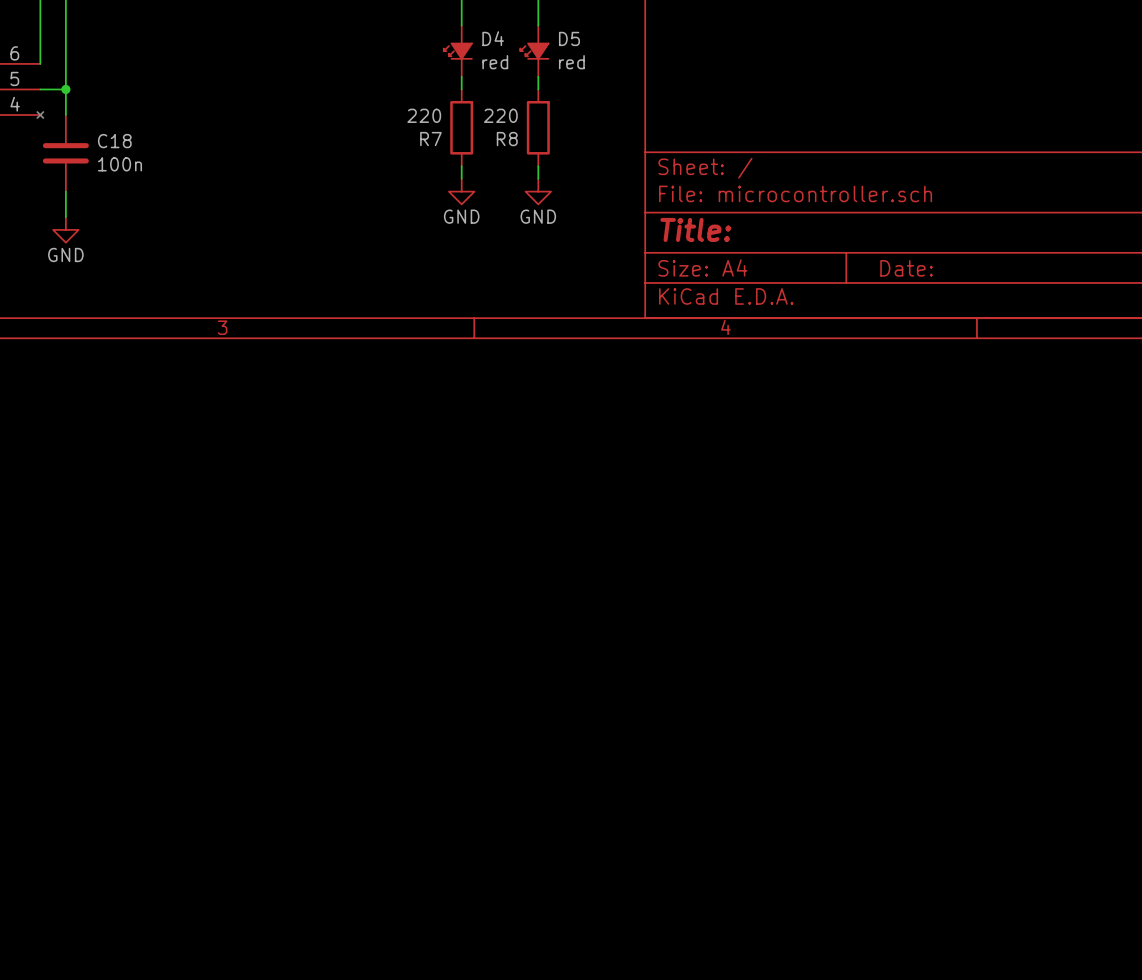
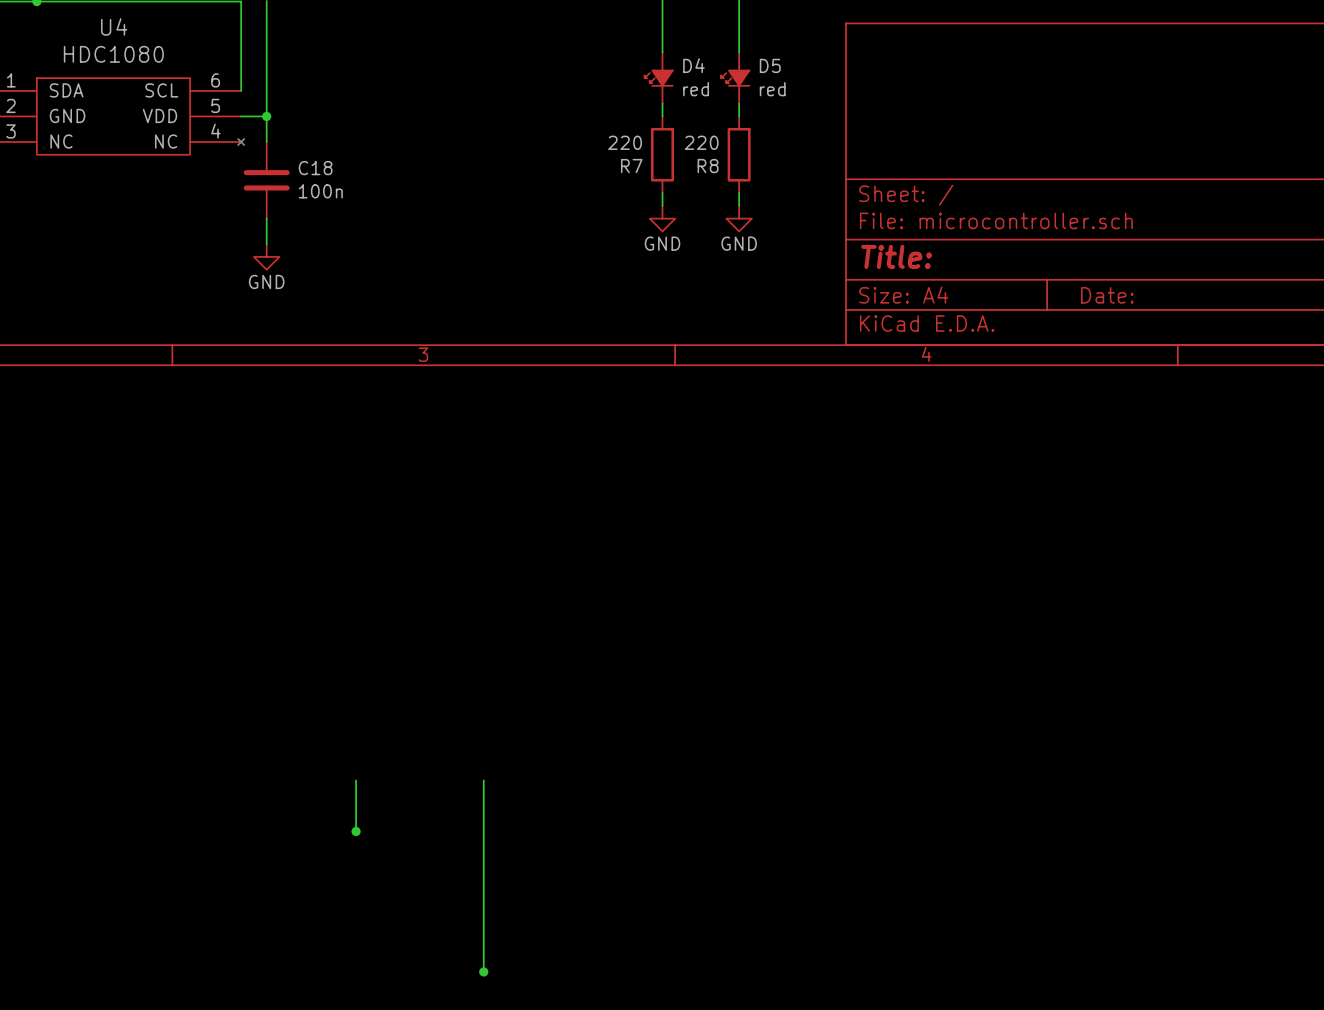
wire: none -> (356, 780) (356, 831)
wire: none -> (483, 780) (483, 971)
junction: none -> (356, 831)
junction: none -> (483, 971)

